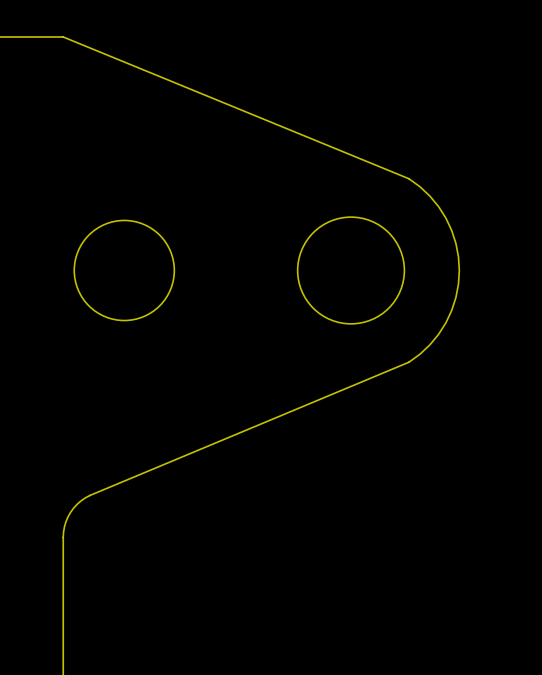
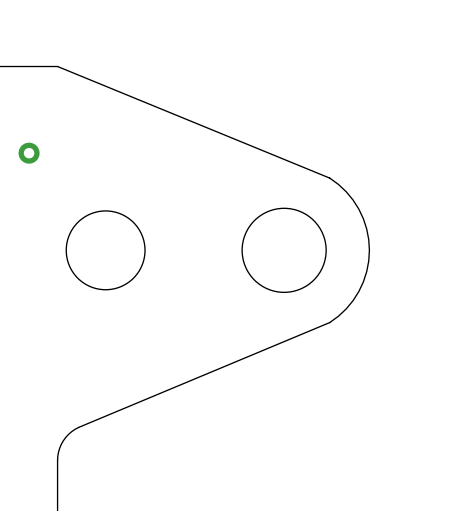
via: none -> (29, 153)

